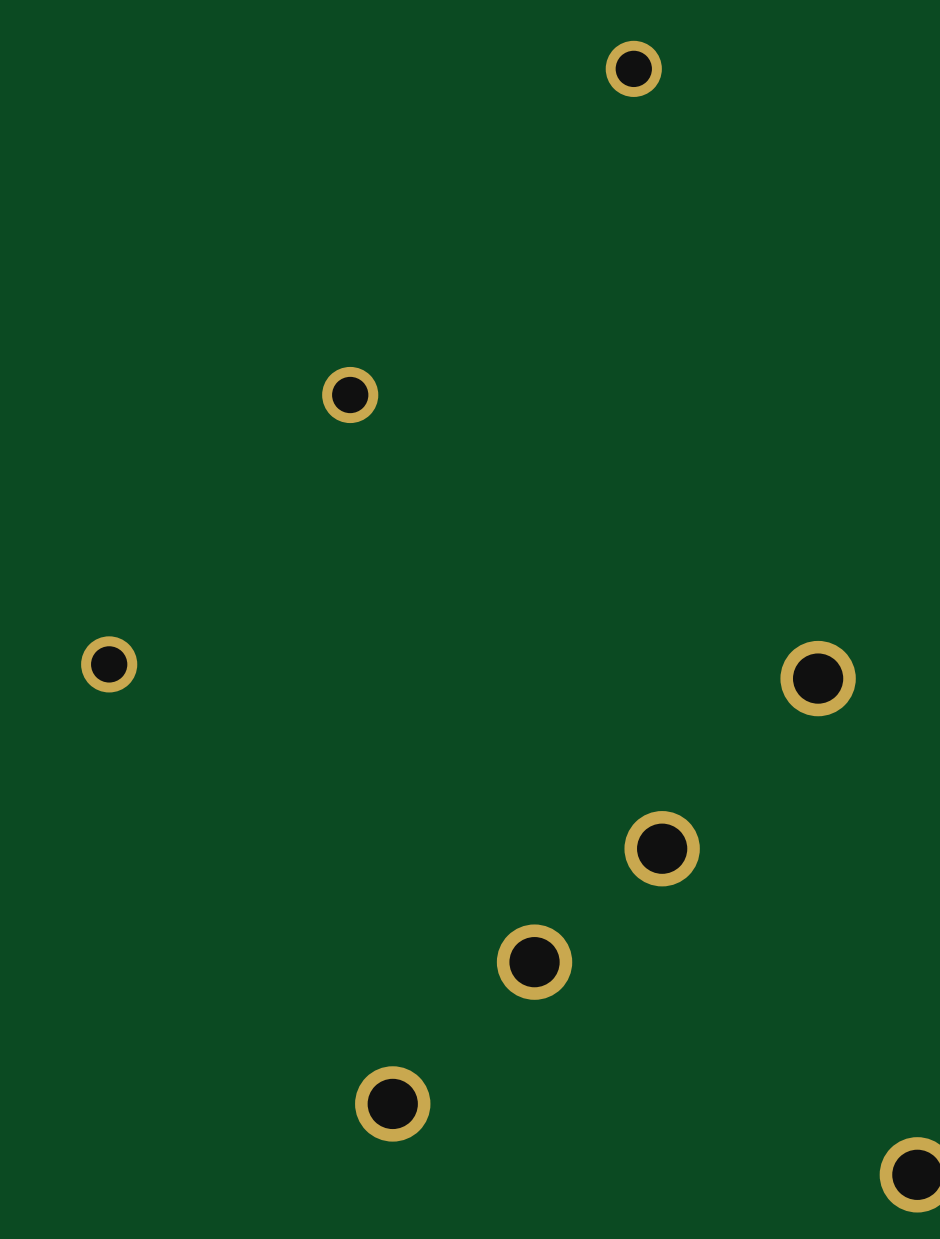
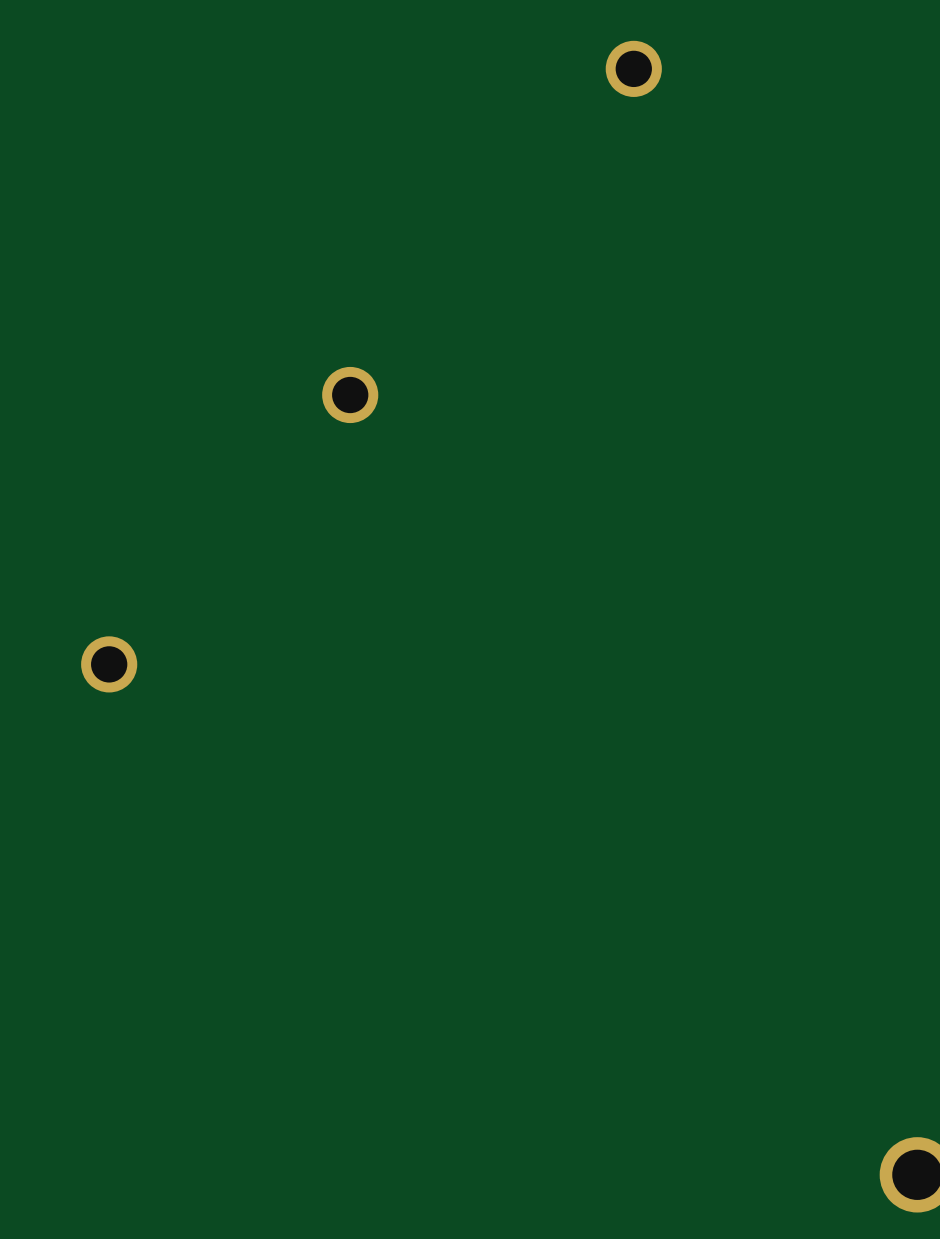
via: (818, 678) -> none
via: (662, 848) -> none
via: (534, 962) -> none
via: (392, 1103) -> none

